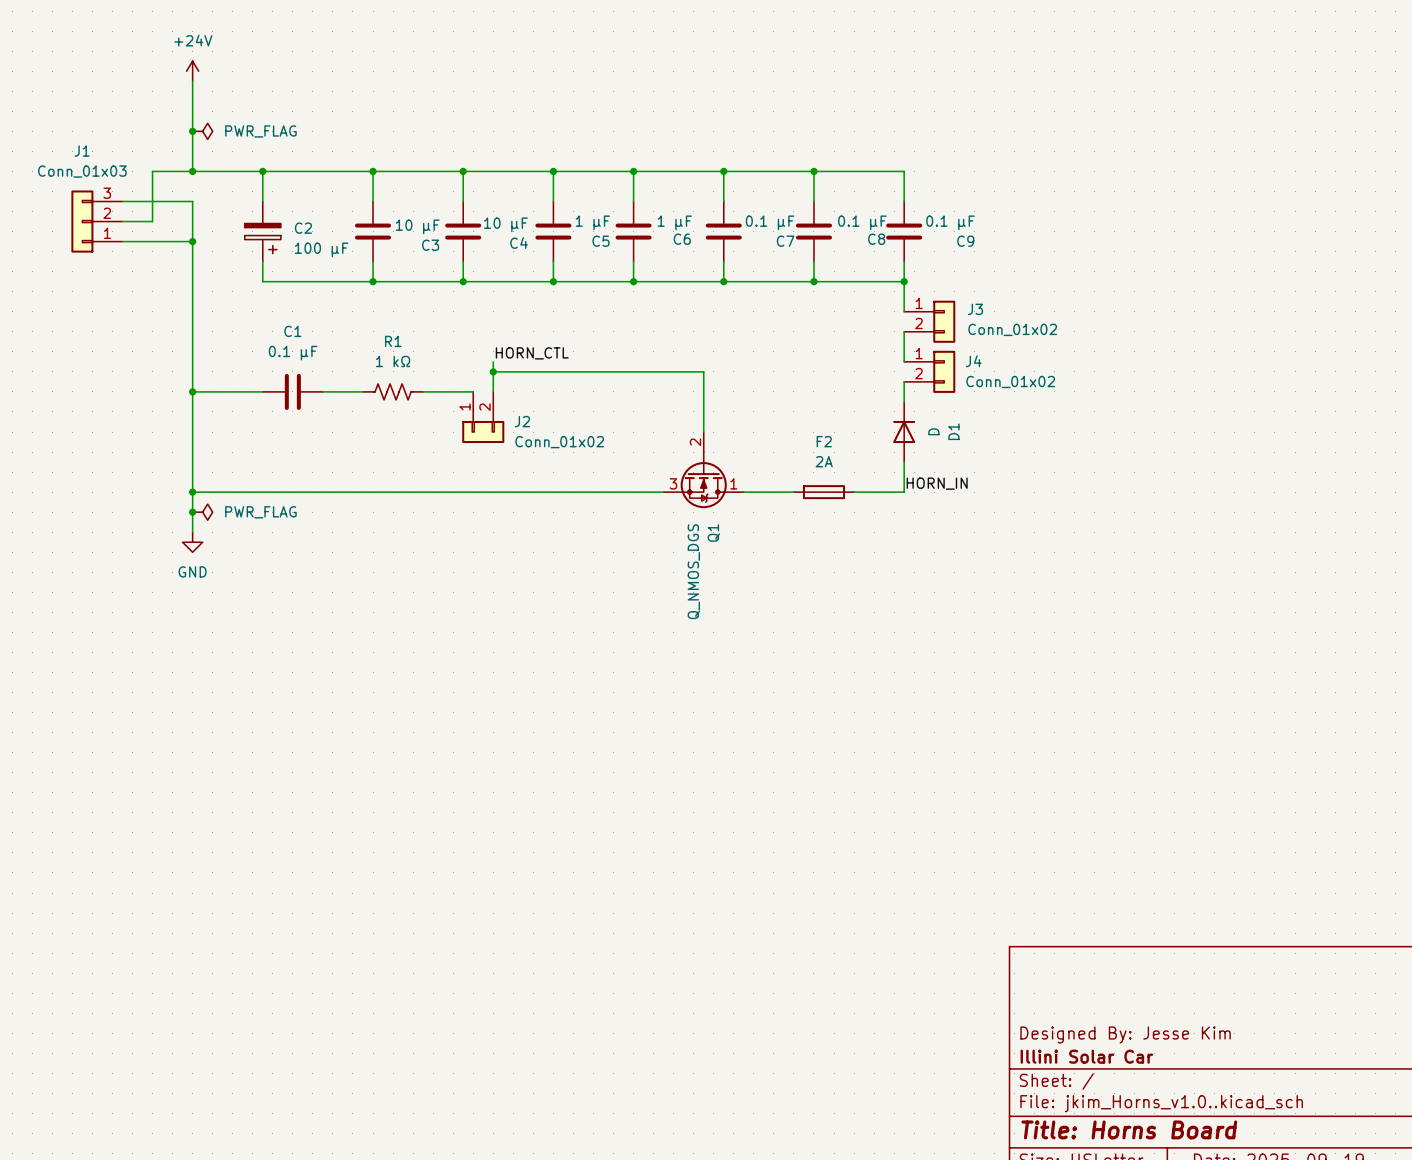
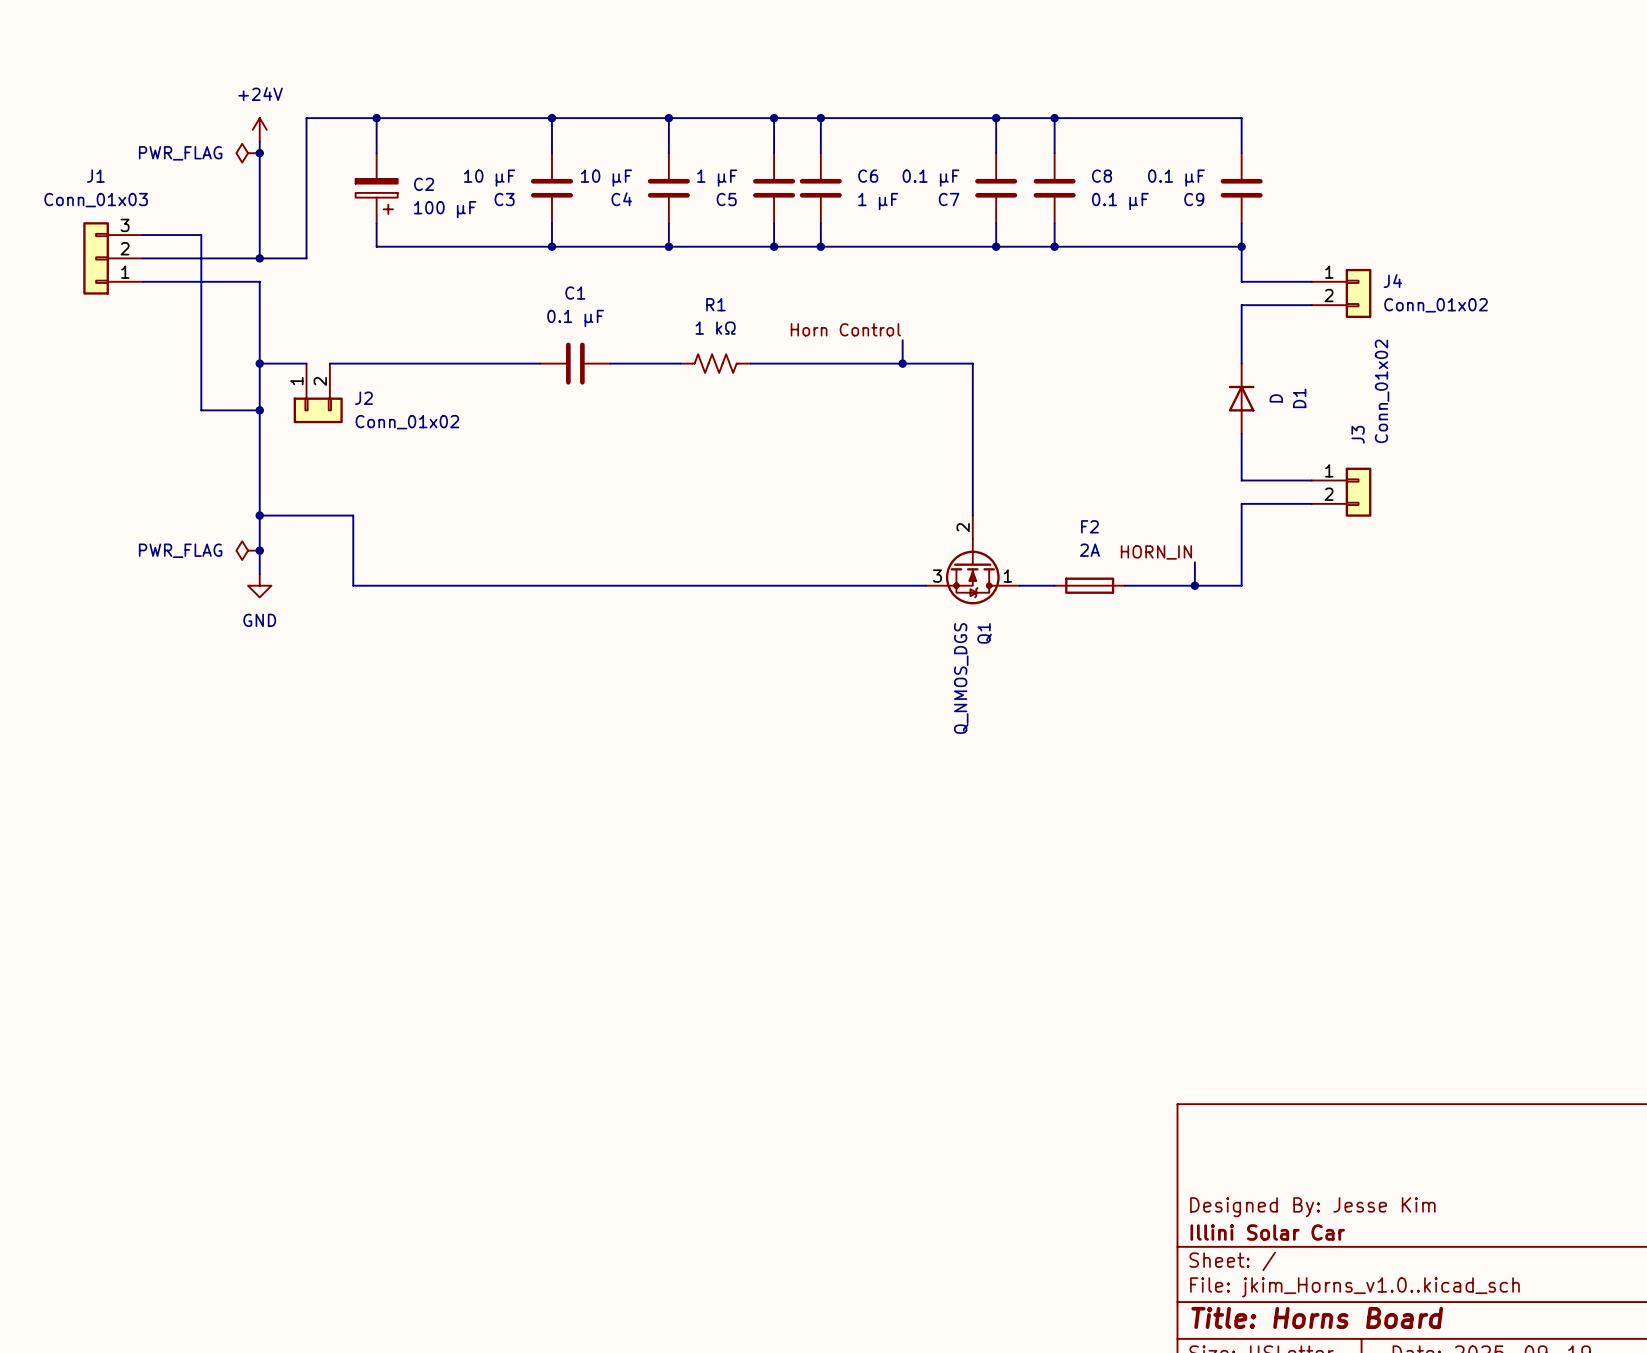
power symbol position: +24V (192, 71) -> +24V (259, 129)
wire: (192, 81) (192, 171) -> none
junction: none -> (376, 118)
junction: none -> (551, 118)
junction: none -> (668, 118)
junction: none -> (774, 118)
junction: none -> (820, 118)
junction: none -> (996, 118)
wire: none -> (1054, 118) (1054, 153)
junction: none -> (1054, 118)
wire: none -> (259, 141) (259, 258)
junction: (192, 131) -> none
power symbol rotation: 0° (202, 131) -> 180° (248, 153)
junction: none -> (259, 153)
wire: none -> (1241, 153) (1241, 118) (306, 118) (306, 199)
junction: (192, 171) -> none
junction: (262, 171) -> none
wire: (373, 171) (373, 201) -> (376, 118) (376, 153)
junction: (373, 171) -> none
wire: (463, 171) (463, 201) -> (551, 118) (551, 153)
junction: (463, 171) -> none
wire: (553, 171) (553, 201) -> (820, 118) (820, 153)
junction: (553, 171) -> none
wire: (633, 171) (633, 201) -> (668, 118) (668, 153)
junction: (633, 171) -> none
wire: (723, 171) (723, 201) -> (774, 118) (774, 153)
junction: (723, 171) -> none
wire: (813, 171) (813, 201) -> (996, 118) (996, 153)
junction: (813, 171) -> none
wire: none -> (376, 223) (376, 246) (1241, 246)
wire: (904, 191) (904, 171) (152, 171) (152, 221) -> (306, 235) (306, 258) (177, 258)
wire: none -> (1241, 223) (1241, 281) (1311, 281)
wire: (172, 201) (192, 201) (192, 532) -> (201, 235) (201, 410) (259, 410)
junction: none -> (551, 246)
junction: none -> (668, 246)
junction: none -> (774, 246)
junction: none -> (820, 246)
junction: none -> (996, 246)
junction: none -> (1054, 246)
junction: none -> (1241, 246)
junction: none -> (259, 258)
C5 value position: 1 µF (592, 222) -> 1 µF (717, 178)
C6 value position: 1 µF (674, 222) -> 1 µF (878, 201)
C7 value position: 0.1 µF (770, 222) -> 0.1 µF (930, 178)
C8 value position: 0.1 µF (862, 222) -> 0.1 µF (1120, 201)
C9 value position: 0.1 µF (950, 222) -> 0.1 µF (1176, 178)
C4 value position: 10 µF (505, 224) -> 10 µF (606, 178)
C3 value position: 10 µF (417, 226) -> 10 µF (489, 178)
C2 position: (262, 231) -> (376, 188)
C3 position: (373, 231) -> (551, 188)
C4 position: (463, 231) -> (668, 188)
C5 position: (553, 231) -> (774, 188)
C6 position: (633, 231) -> (820, 188)
C7 position: (723, 231) -> (996, 188)
C8 position: (813, 231) -> (1054, 188)
C9 position: (904, 231) -> (1241, 188)
C6 name position: C6 (682, 239) -> C6 (868, 176)
C8 name position: C8 (876, 239) -> C8 (1102, 176)
wire: none -> (224, 281) (259, 281) (259, 574)
junction: (192, 241) -> none
C5 name position: C5 (600, 241) -> C5 (726, 199)
C7 name position: C7 (785, 241) -> C7 (949, 199)
C9 name position: C9 (965, 241) -> C9 (1194, 199)
C4 name position: C4 (519, 242) -> C4 (621, 199)
C3 name position: C3 (430, 245) -> C3 (504, 199)
wire: (262, 261) (262, 281) (904, 281) -> none
wire: (373, 261) (373, 281) -> none
wire: (463, 261) (463, 281) -> (551, 223) (551, 246)
wire: (553, 261) (553, 281) -> (820, 223) (820, 246)
wire: (633, 261) (633, 281) -> (668, 223) (668, 246)
wire: (723, 261) (723, 281) -> (774, 223) (774, 246)
wire: (813, 261) (813, 281) -> (996, 223) (996, 246)
wire: (904, 261) (904, 311) -> none
wire: none -> (1311, 305) (1241, 305) (1241, 363)
junction: (373, 281) -> none
junction: (463, 281) -> none
junction: (553, 281) -> none
junction: (633, 281) -> none
junction: (723, 281) -> none
junction: (813, 281) -> none
junction: (904, 281) -> none
label: none -> Horn Control (845, 329)
wire: none -> (902, 340) (902, 363)
J3 name rotation: 0° (975, 309) -> 90° counterclockwise (1358, 434)
J3 name position: J3 (975, 309) -> J3 (1358, 434)
junction: none -> (259, 363)
wire: none -> (329, 363) (540, 363)
wire: none -> (610, 363) (680, 363)
wire: none -> (750, 363) (972, 363) (972, 515)
junction: none -> (902, 363)
J3 position: (929, 321) -> (1341, 492)
J3 value rotation: 0° (1012, 329) -> 90° counterclockwise (1382, 391)
J3 value position: Conn_01x02 (1012, 329) -> Conn_01x02 (1382, 391)
wire: (904, 331) (904, 361) -> none
junction: none -> (259, 410)
label: HORN_CTL (532, 353) -> none
wire: (493, 361) (493, 391) -> none
wire: (493, 371) (703, 371) (703, 432) -> none
junction: (493, 371) -> none
J4 position: (929, 371) -> (1341, 293)
wire: none -> (1241, 433) (1241, 480) (1311, 480)
wire: (904, 381) (904, 401) -> (1194, 562) (1194, 585)
wire: (192, 391) (262, 391) -> none
junction: (192, 391) -> none
C1 position: (292, 391) -> (575, 363)
wire: (322, 391) (363, 391) -> (259, 363) (306, 363)
R1 position: (393, 391) -> (715, 363)
wire: (423, 391) (473, 391) -> none
J2 position: (483, 417) -> (318, 393)
D1 position: (904, 432) -> (1241, 398)
wire: none -> (1311, 503) (1241, 503) (1241, 585) (1124, 585)
wire: none -> (259, 515) (353, 515) (353, 585) (926, 585)
junction: none -> (259, 515)
wire: (904, 462) (904, 492) (854, 492) -> none
Q1 position: (703, 470) -> (972, 559)
junction: none -> (259, 550)
label position: HORN_IN (937, 483) -> HORN_IN (1156, 552)
wire: (192, 492) (663, 492) -> none
junction: (192, 492) -> none
wire: (743, 492) (793, 492) -> none
F2 position: (824, 492) -> (1089, 585)
wire: none -> (1019, 585) (1054, 585)
junction: none -> (1194, 585)
junction: (192, 512) -> none
power symbol rotation: 0° (202, 512) -> 180° (248, 550)
power symbol position: PWR_FLAG (202, 512) -> PWR_FLAG (248, 550)
power symbol position: GND (192, 542) -> GND (259, 585)

